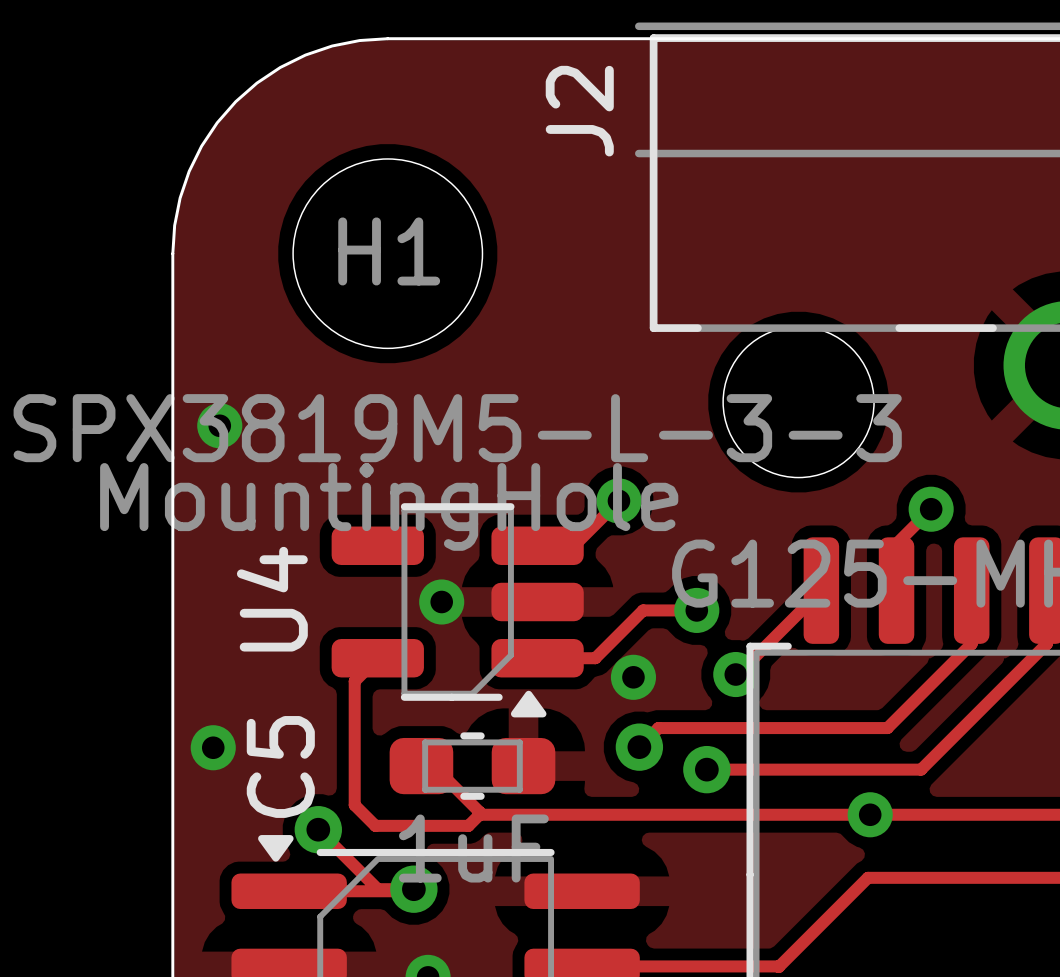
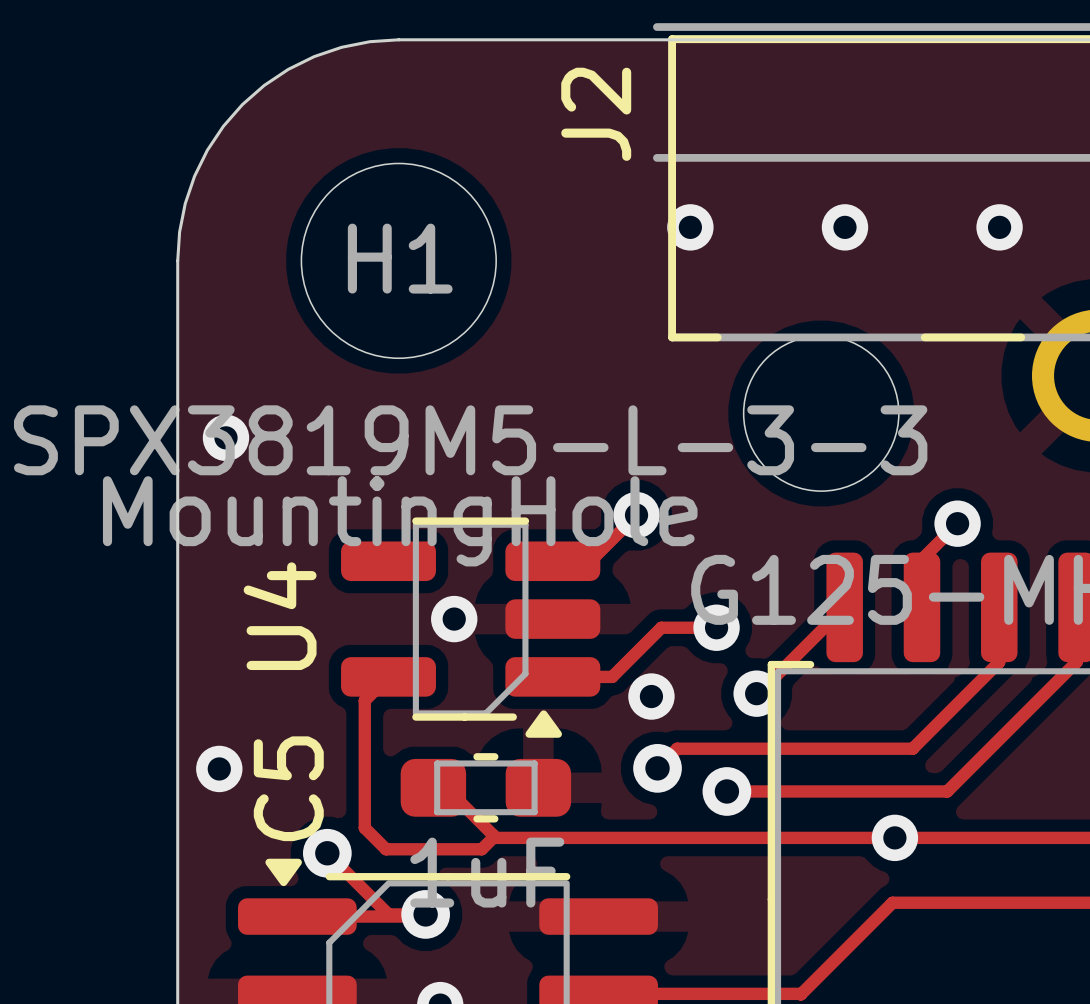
via: none -> (690, 227)
via: none -> (844, 227)
via: none -> (999, 227)

